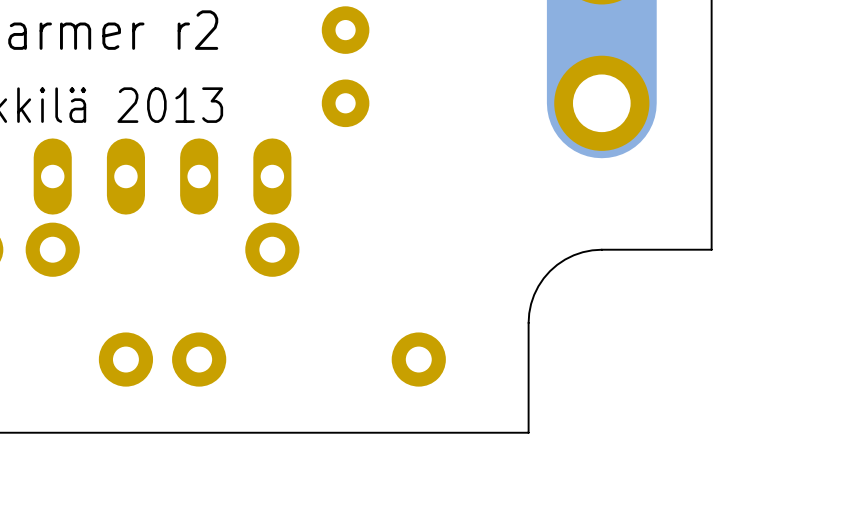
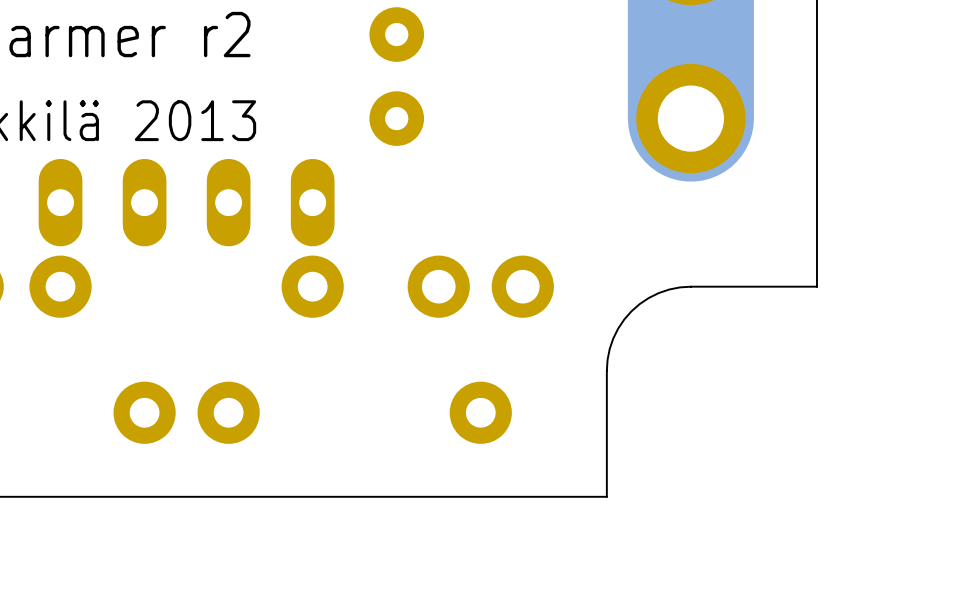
part: none -> (480, 286)

